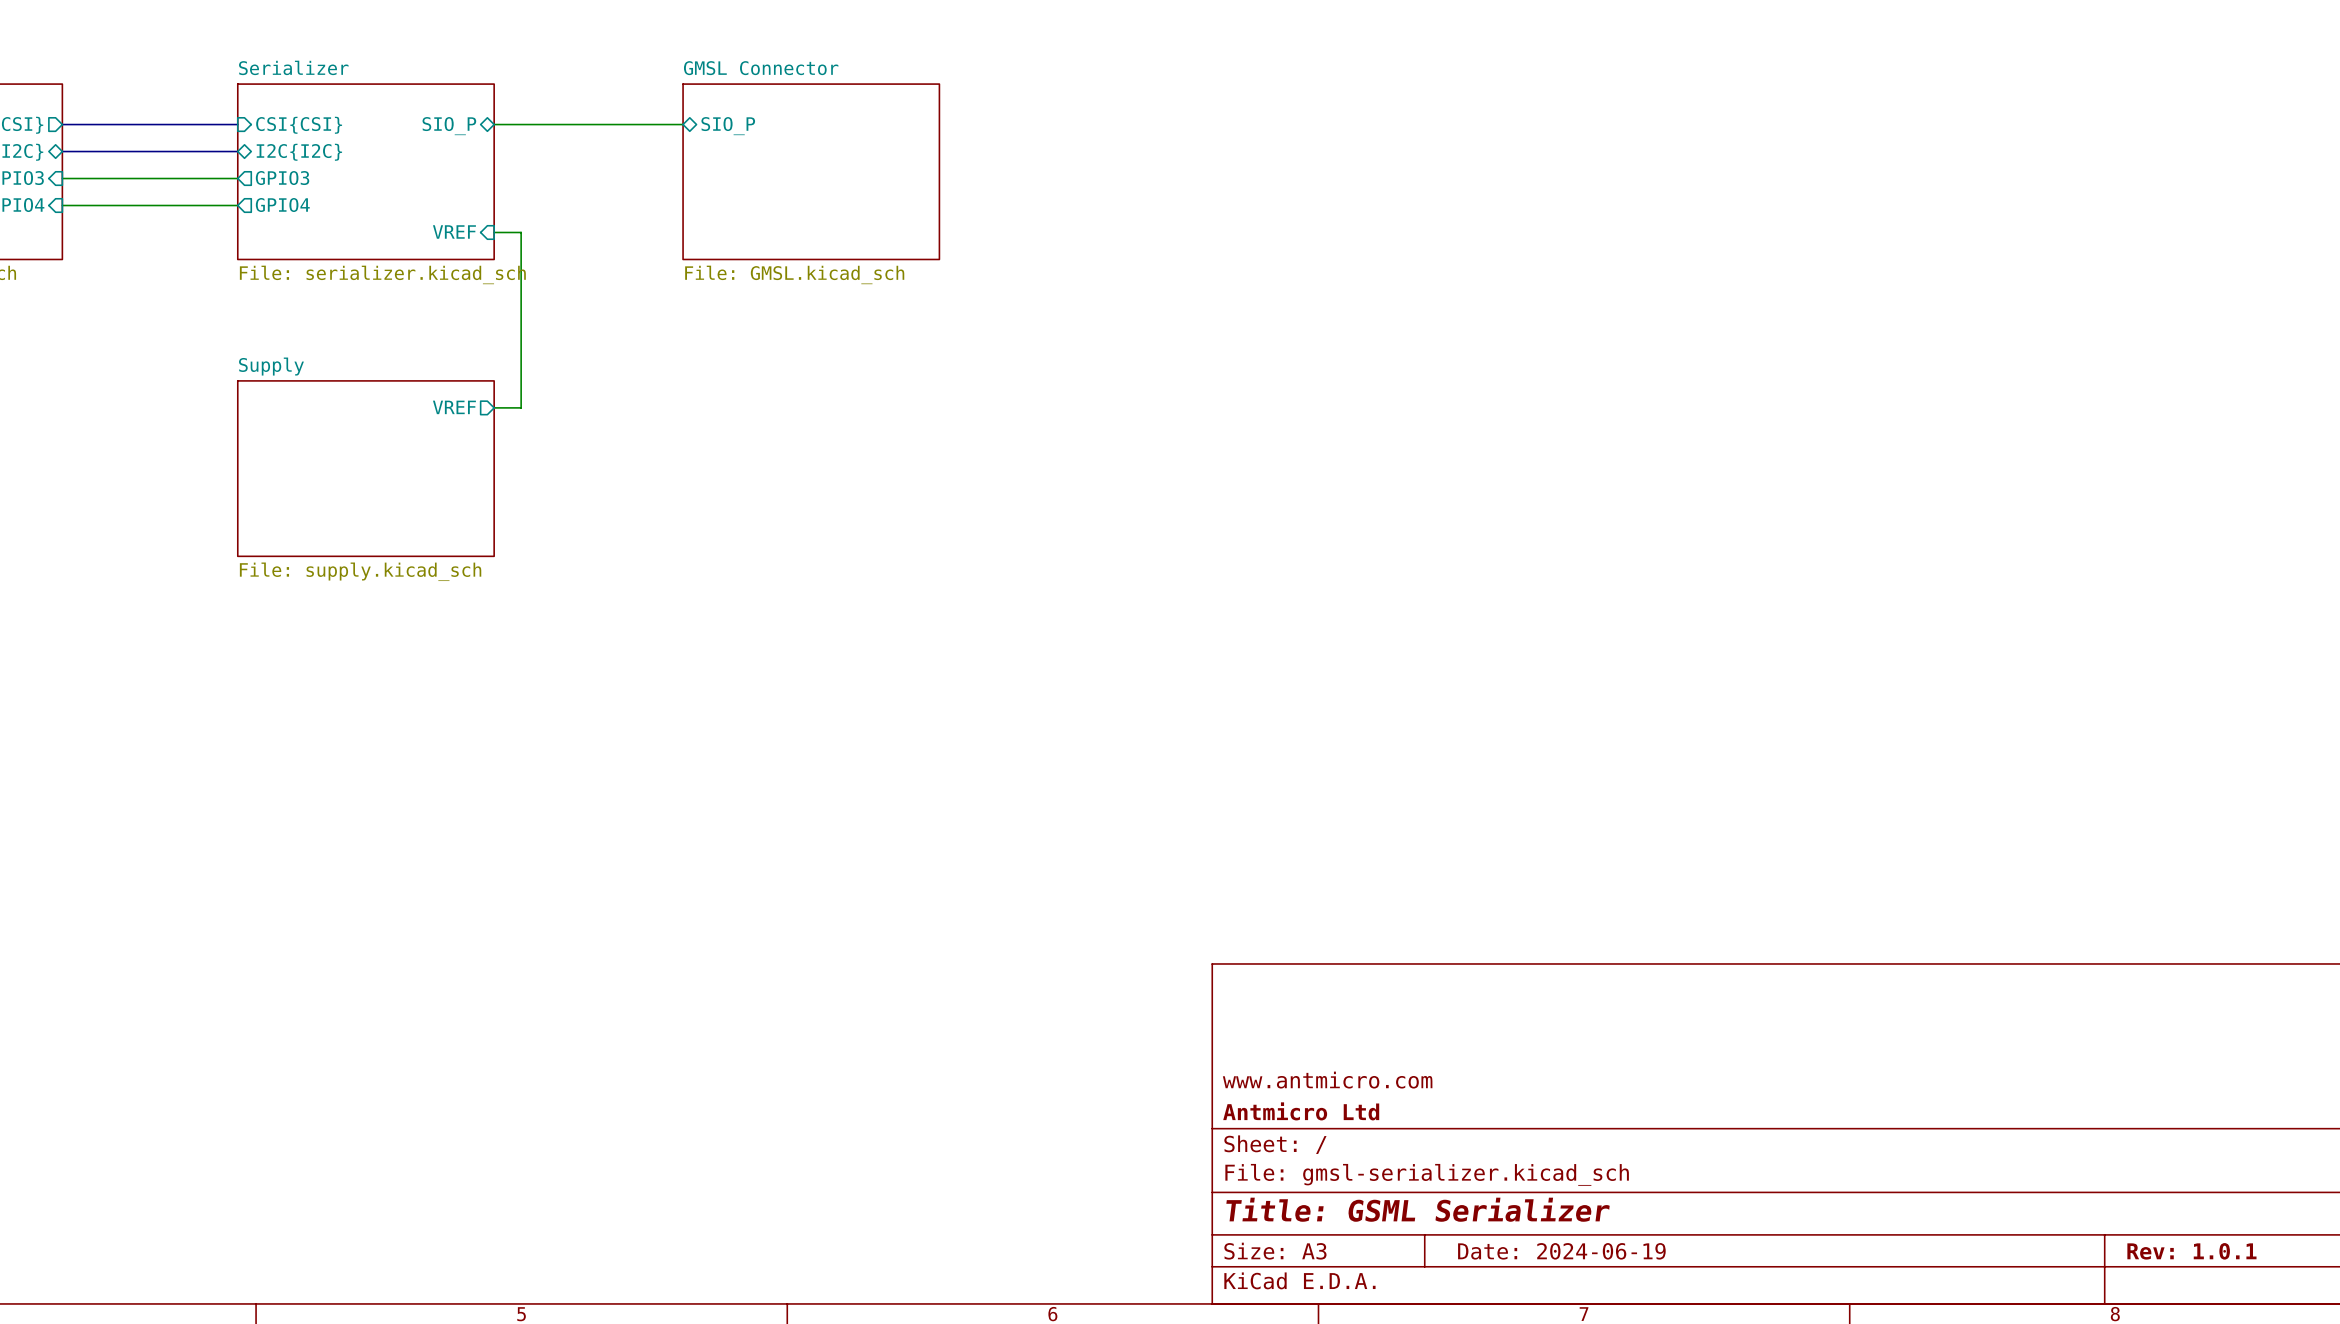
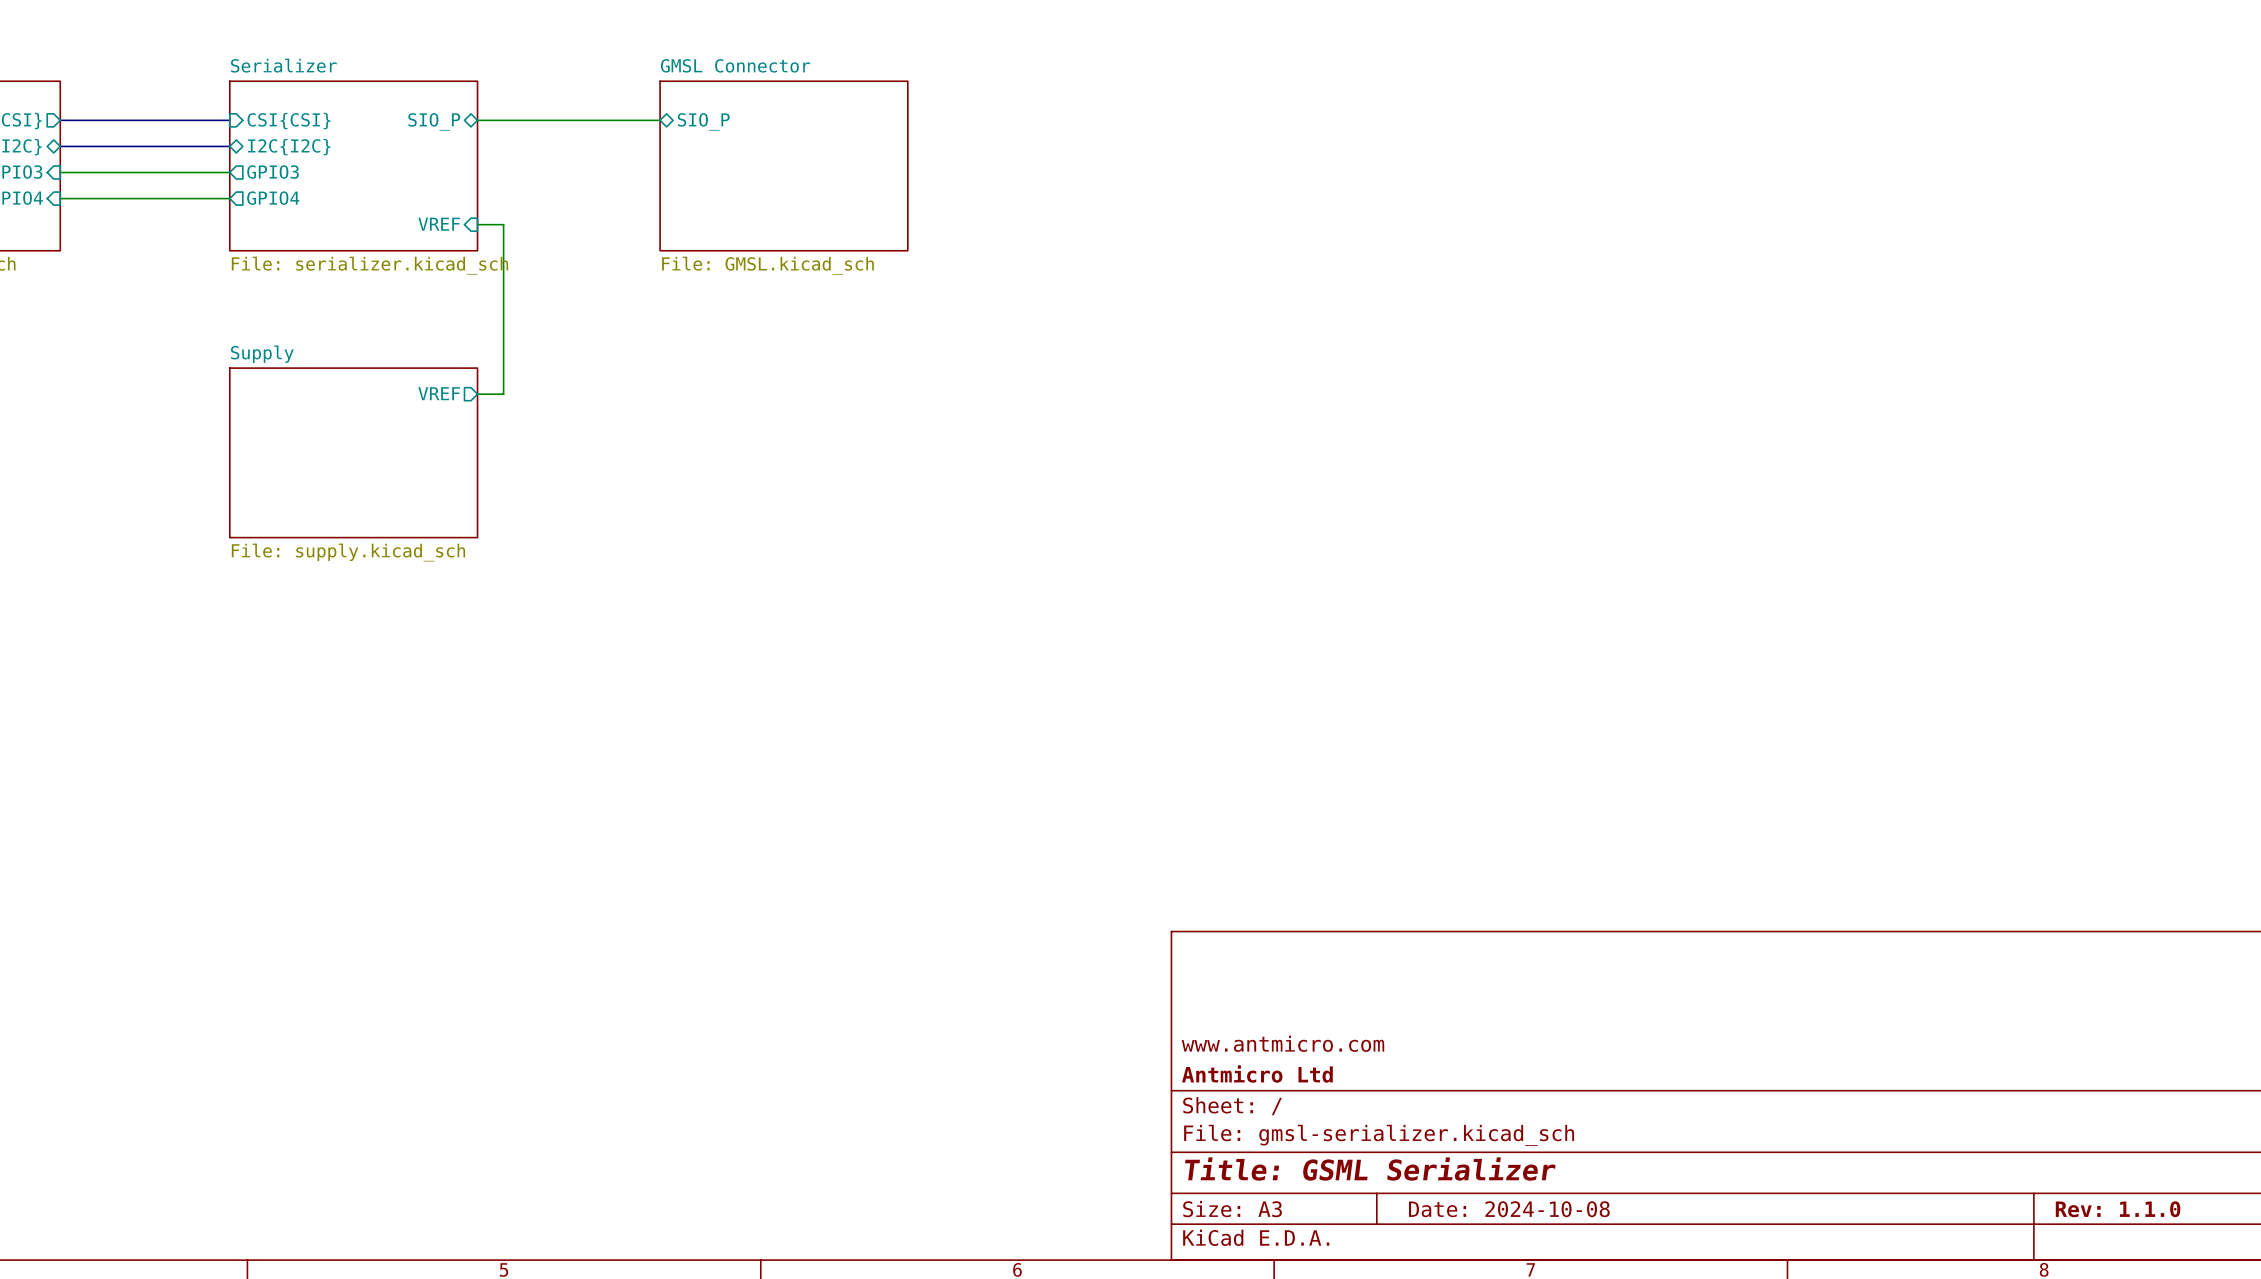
title block: Date: 2024-06-19 (1561, 1251) -> Date: 2024-10-08 (1509, 1209)
title block: Rev: 1.0.1 (2191, 1251) -> Rev: 1.1.0 (2118, 1209)

